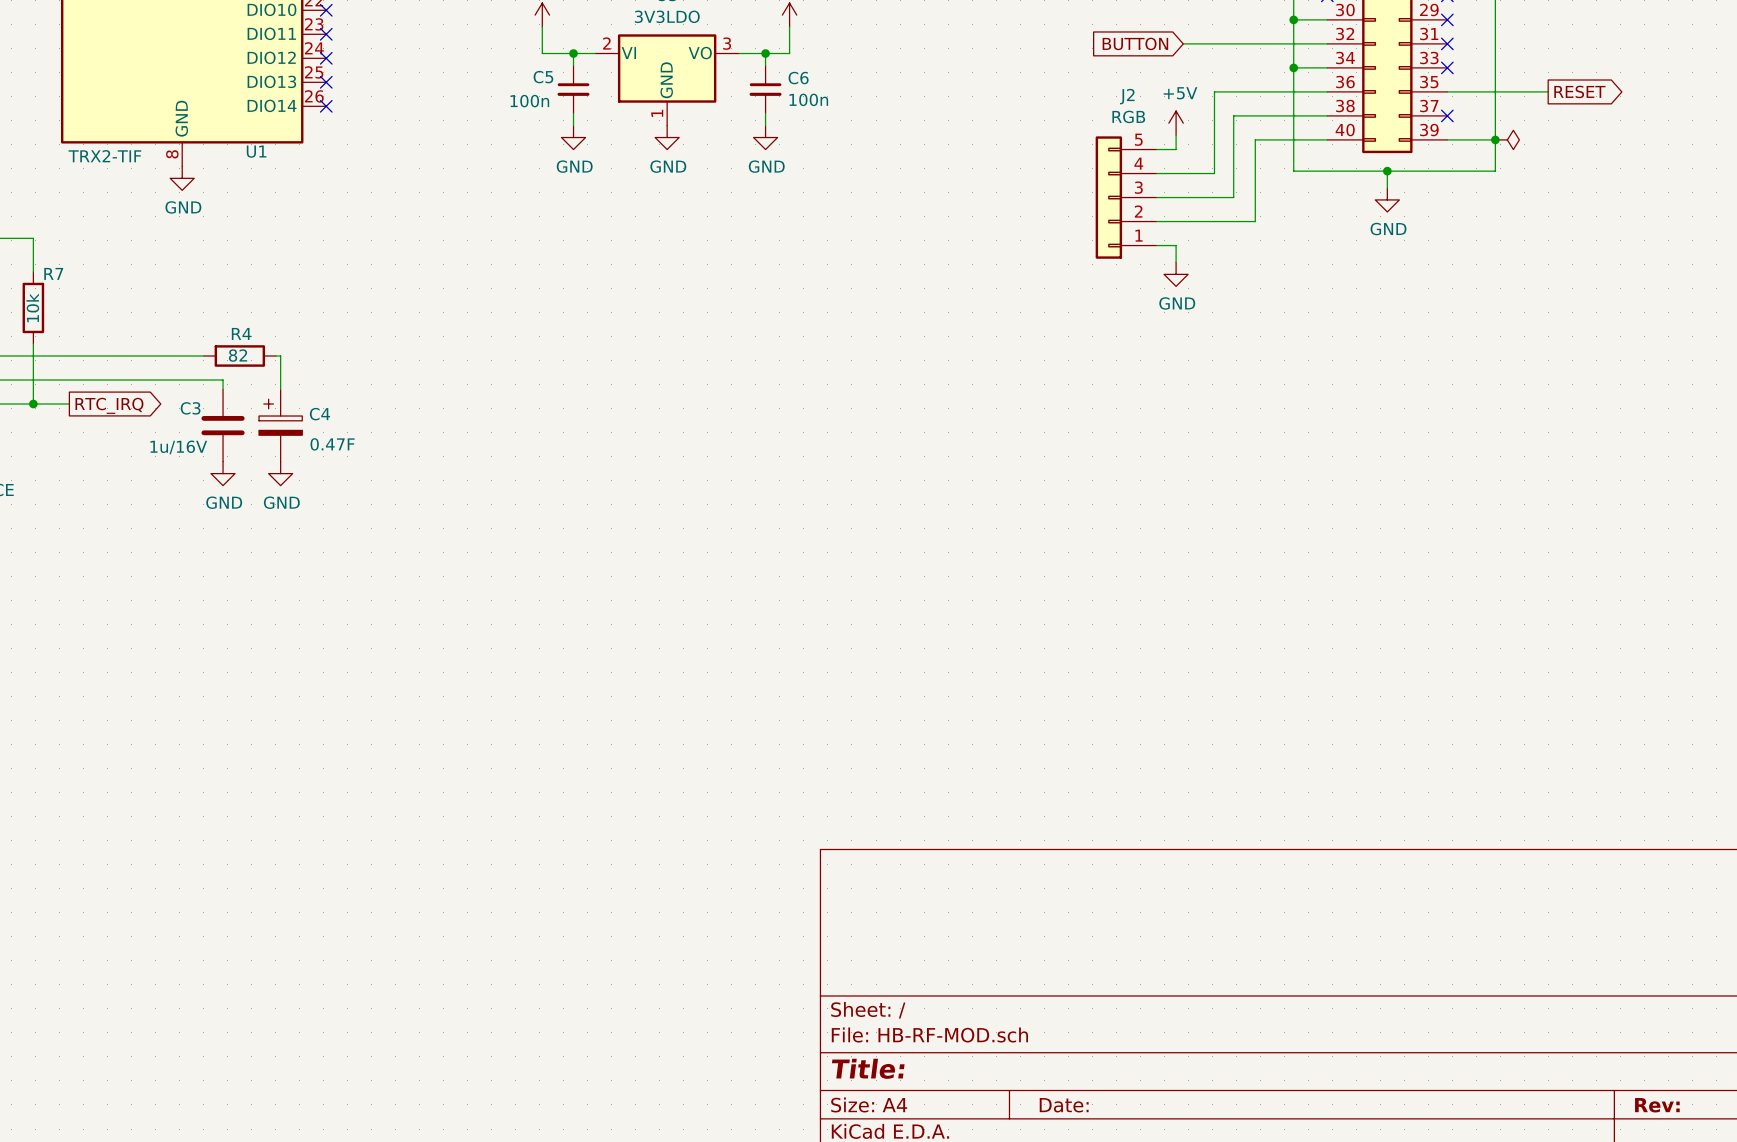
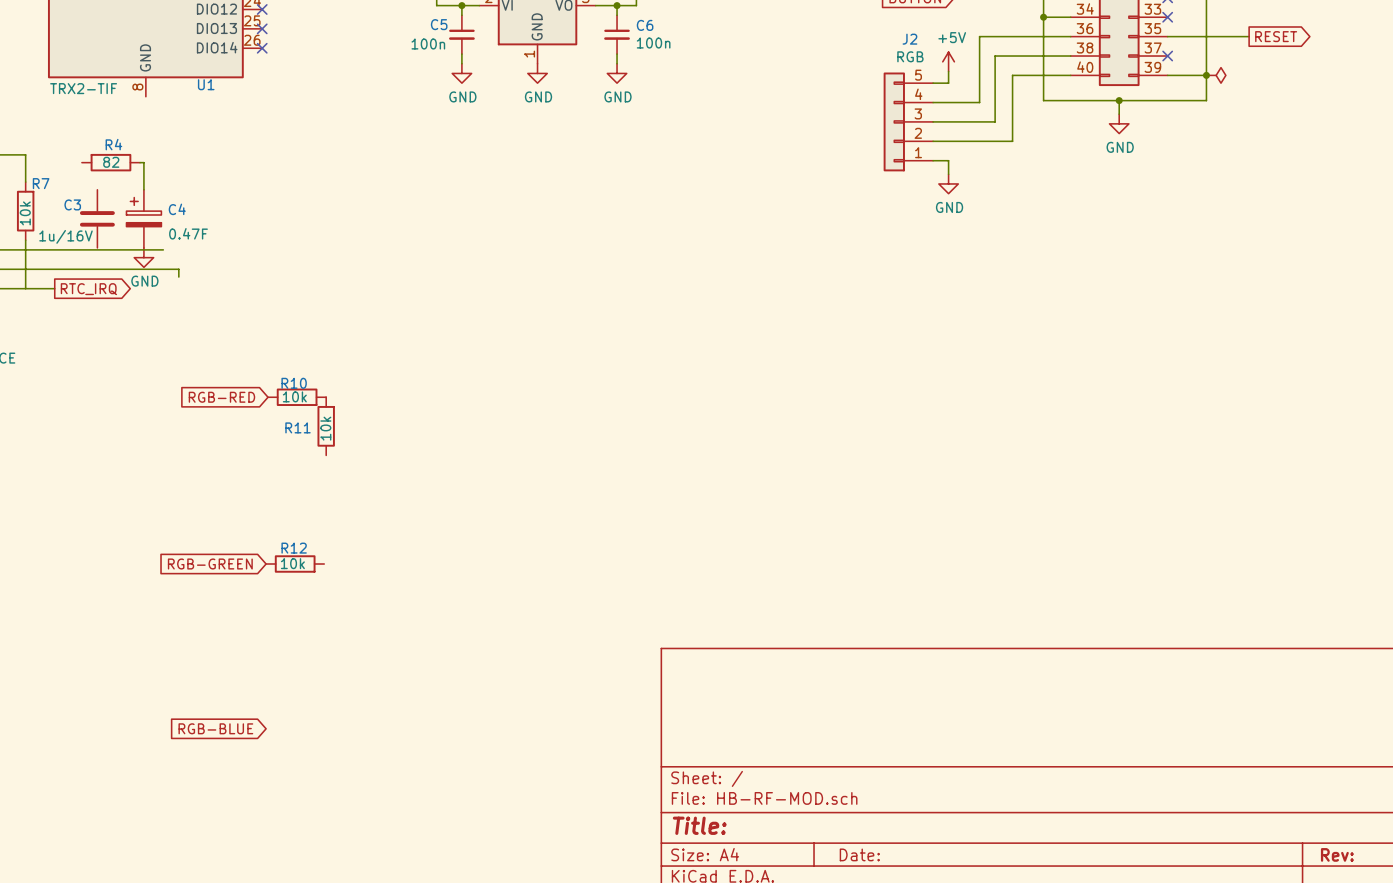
power symbol: GND (182, 178) -> none
R4 position: (239, 355) -> (110, 162)
wire: (275, 355) (280, 355) (280, 389) -> (140, 162) (143, 162) (143, 189)
power symbol: none -> GND (143, 257)
junction: (33, 404) -> none
C3 position: (223, 425) -> (97, 218)
C4 position: (280, 425) -> (143, 218)
power symbol: GND (223, 473) -> none
power symbol: GND (280, 473) -> none
global label: none -> RGB-RED (221, 397)
R10: none -> 10k (297, 397)
R11: none -> 10k (326, 426)
global label: none -> RGB-GREEN (210, 564)
R12: none -> 10k (295, 564)
global label: none -> RGB-BLUE (215, 728)

